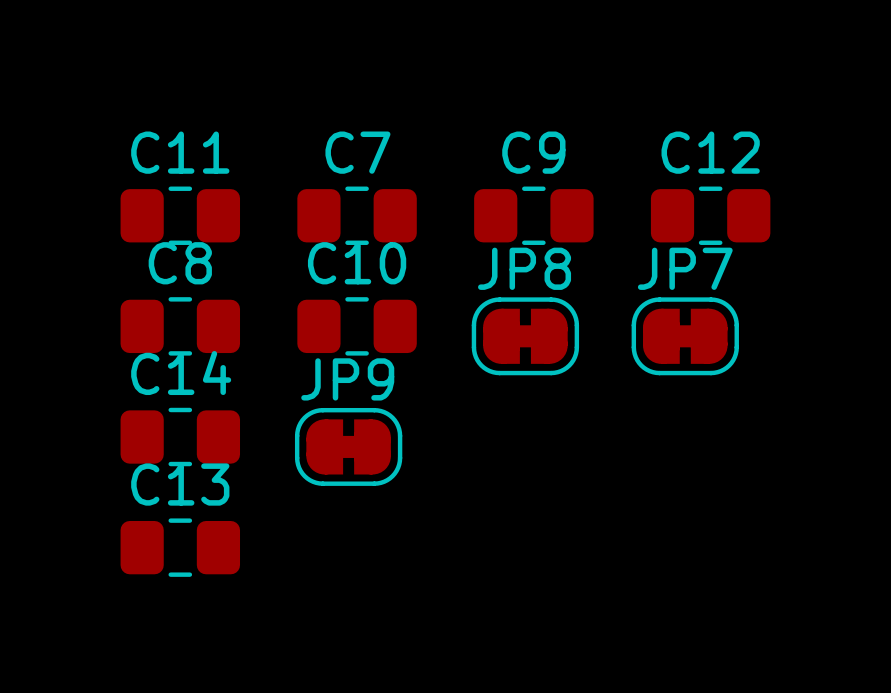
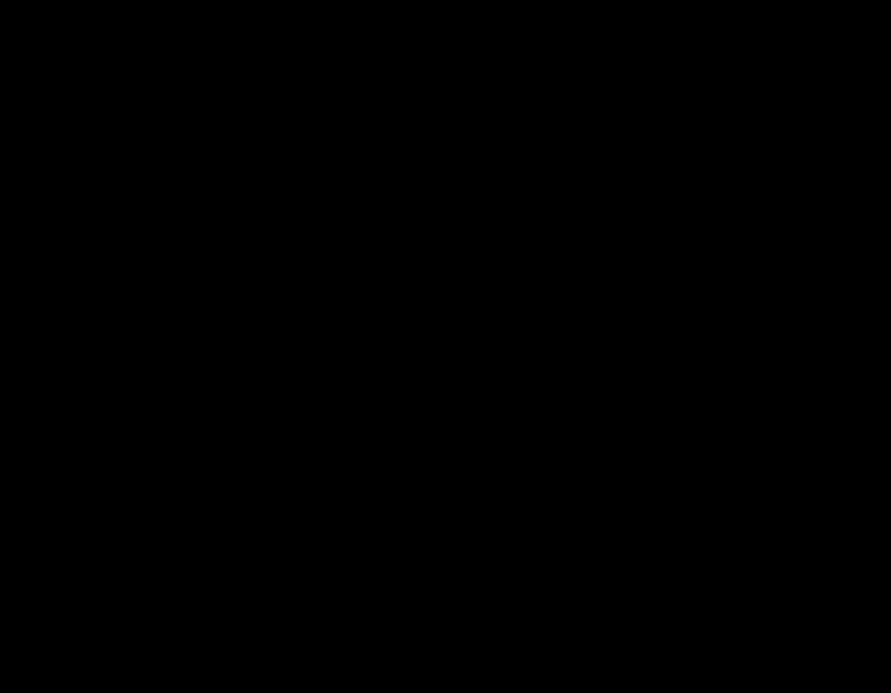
C11: (180, 215) -> none
C7: (357, 215) -> none
C9: (533, 215) -> none
C12: (710, 215) -> none
C8: (180, 326) -> none
C10: (357, 326) -> none
JP8: (525, 336) -> none
JP7: (685, 336) -> none
C14: (180, 437) -> none
JP9: (348, 446) -> none
C13: (180, 547) -> none

